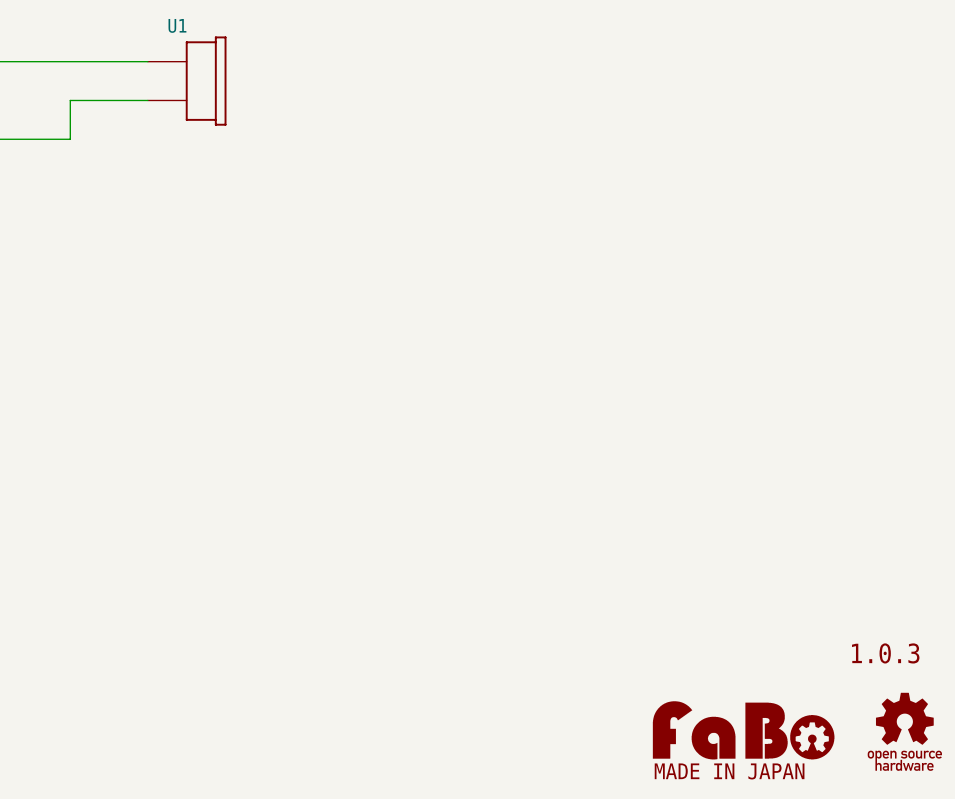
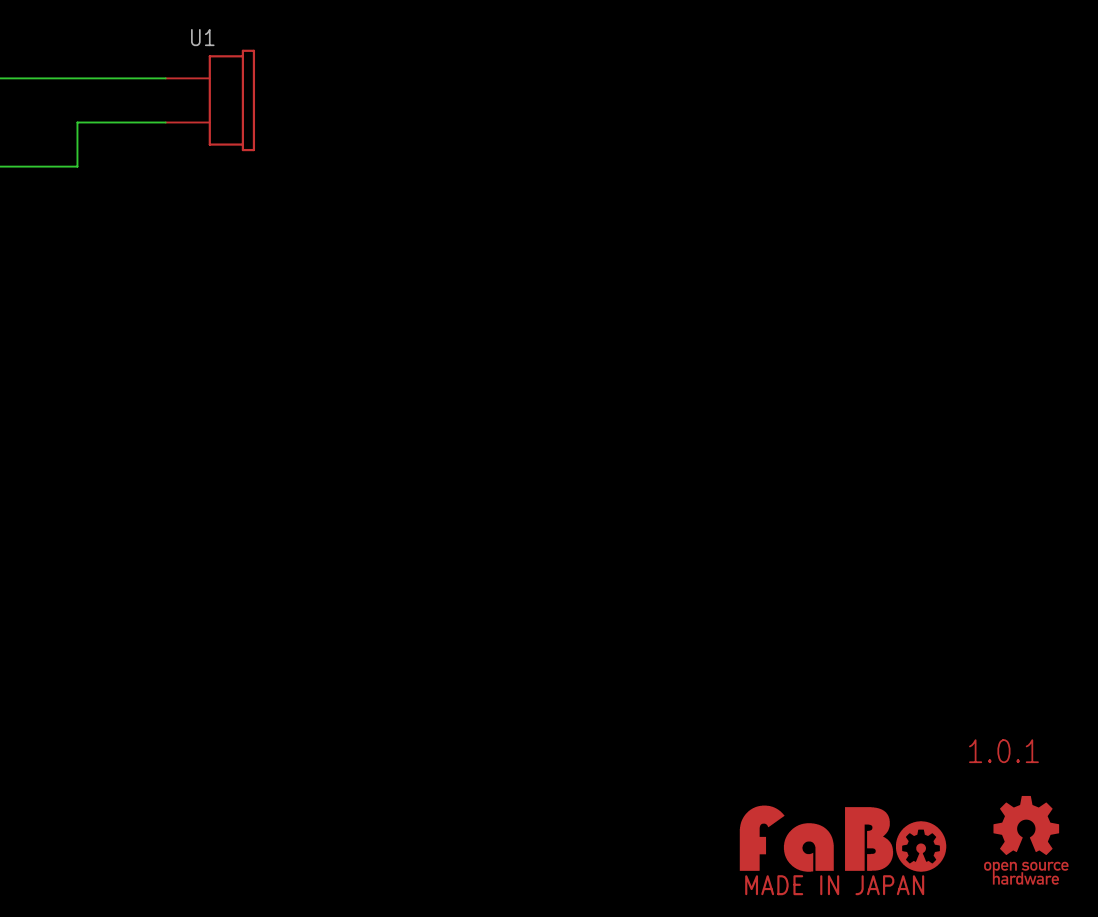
text: 1.0.3 (885, 653) -> 1.0.1 (1003, 751)

